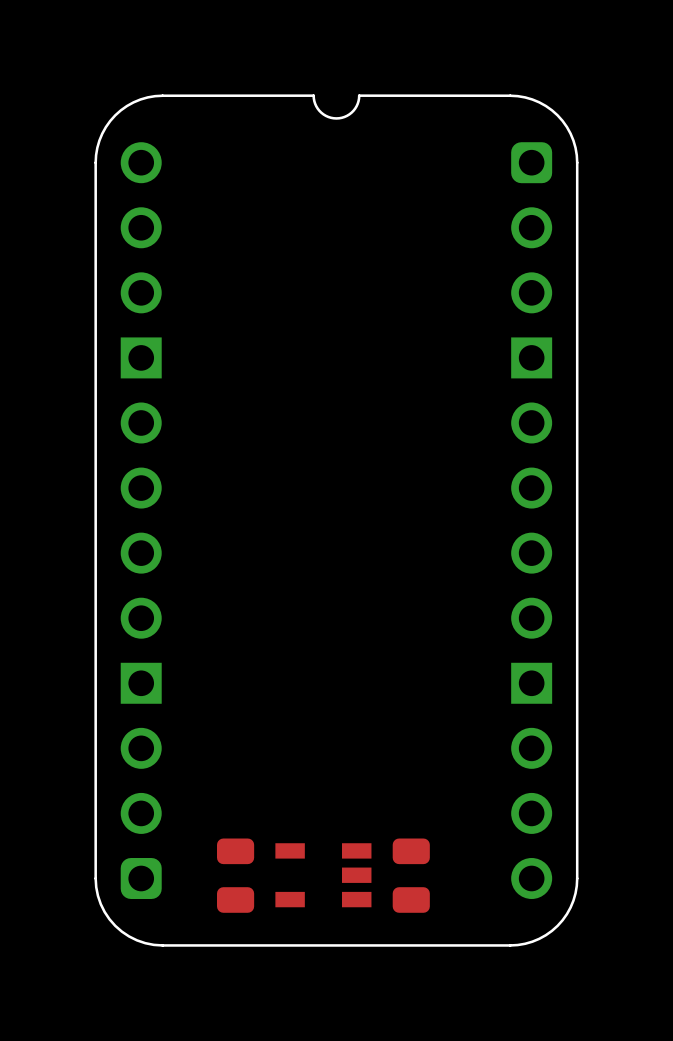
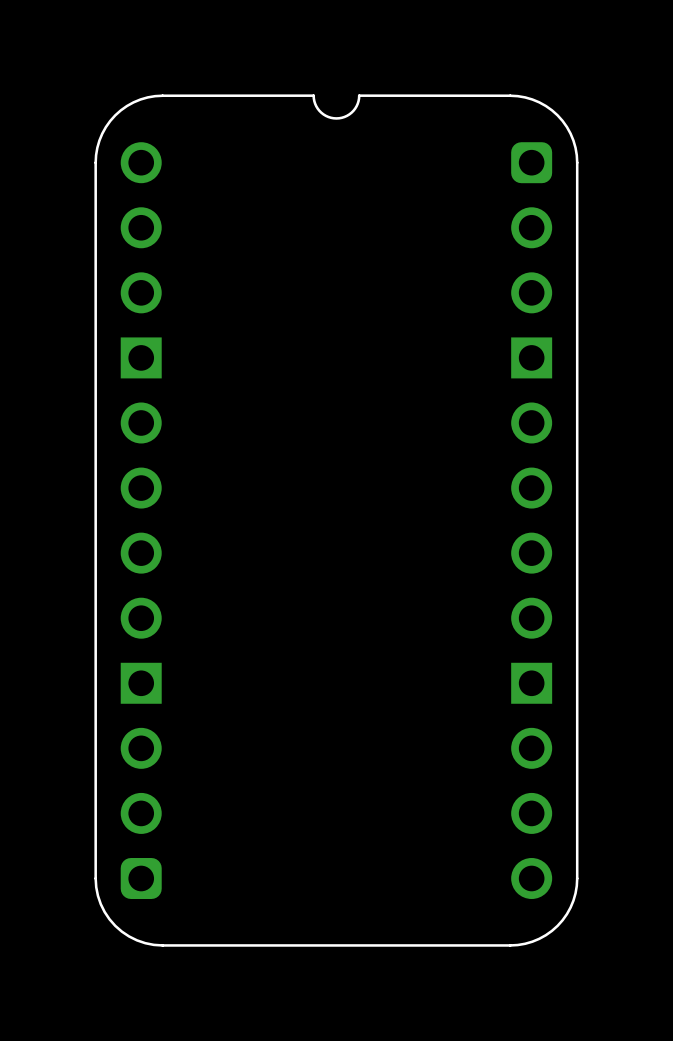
part: (235, 875) -> none
part: (323, 875) -> none
part: (411, 875) -> none

